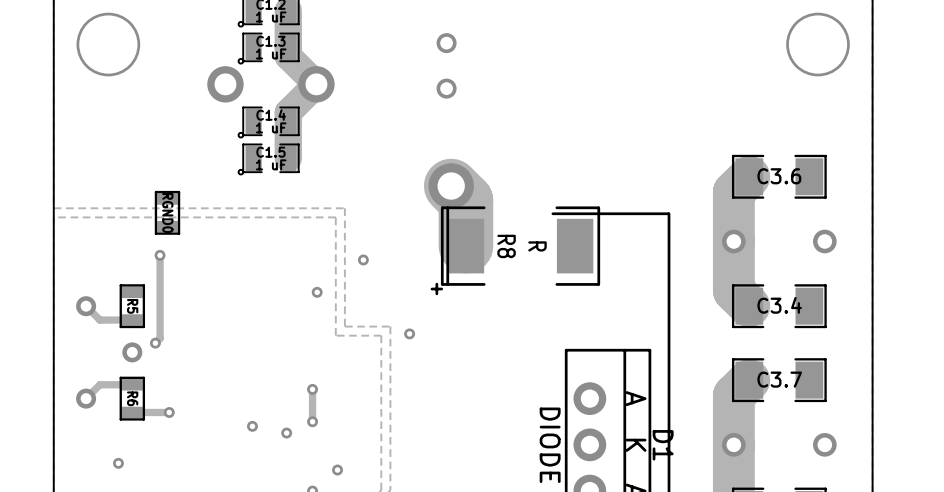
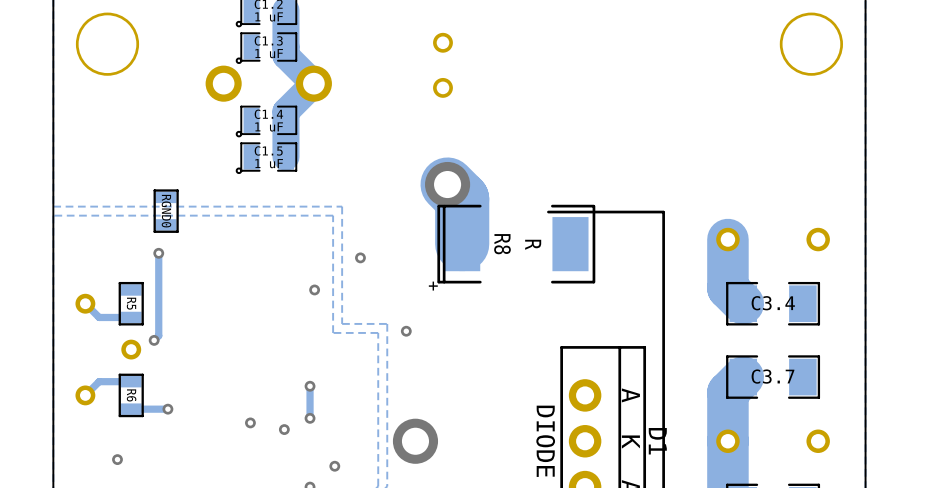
track: (749, 176) (733, 192) (733, 241) -> none
C3.6: (779, 176) -> none
via: none -> (415, 441)

